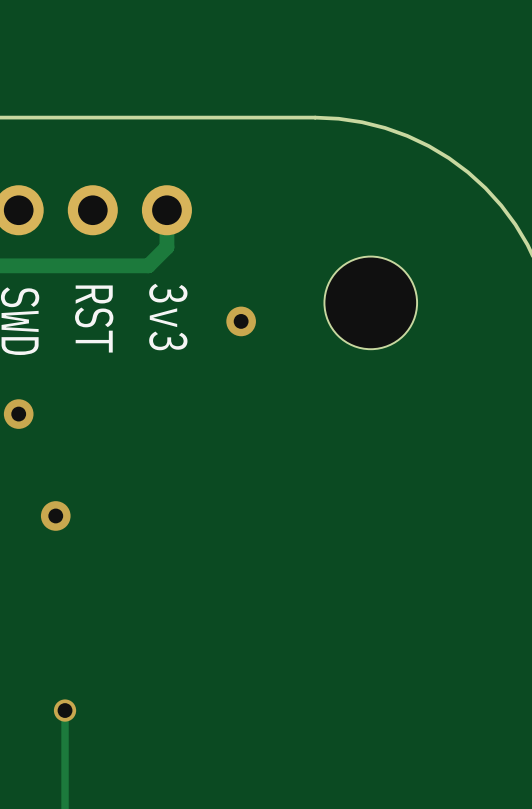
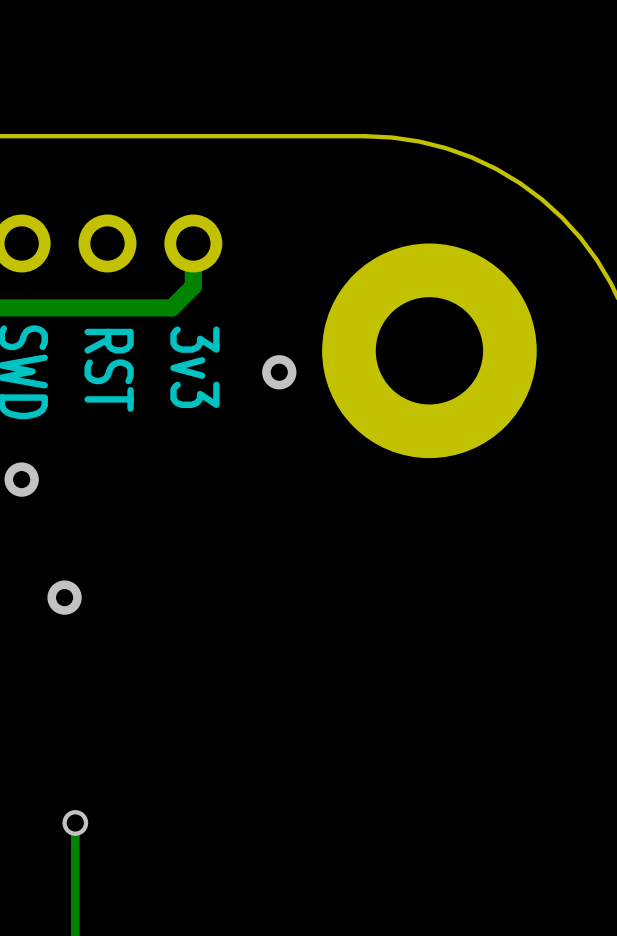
part footprint: [324, 256, 418, 350] -> [322, 243, 537, 459]

